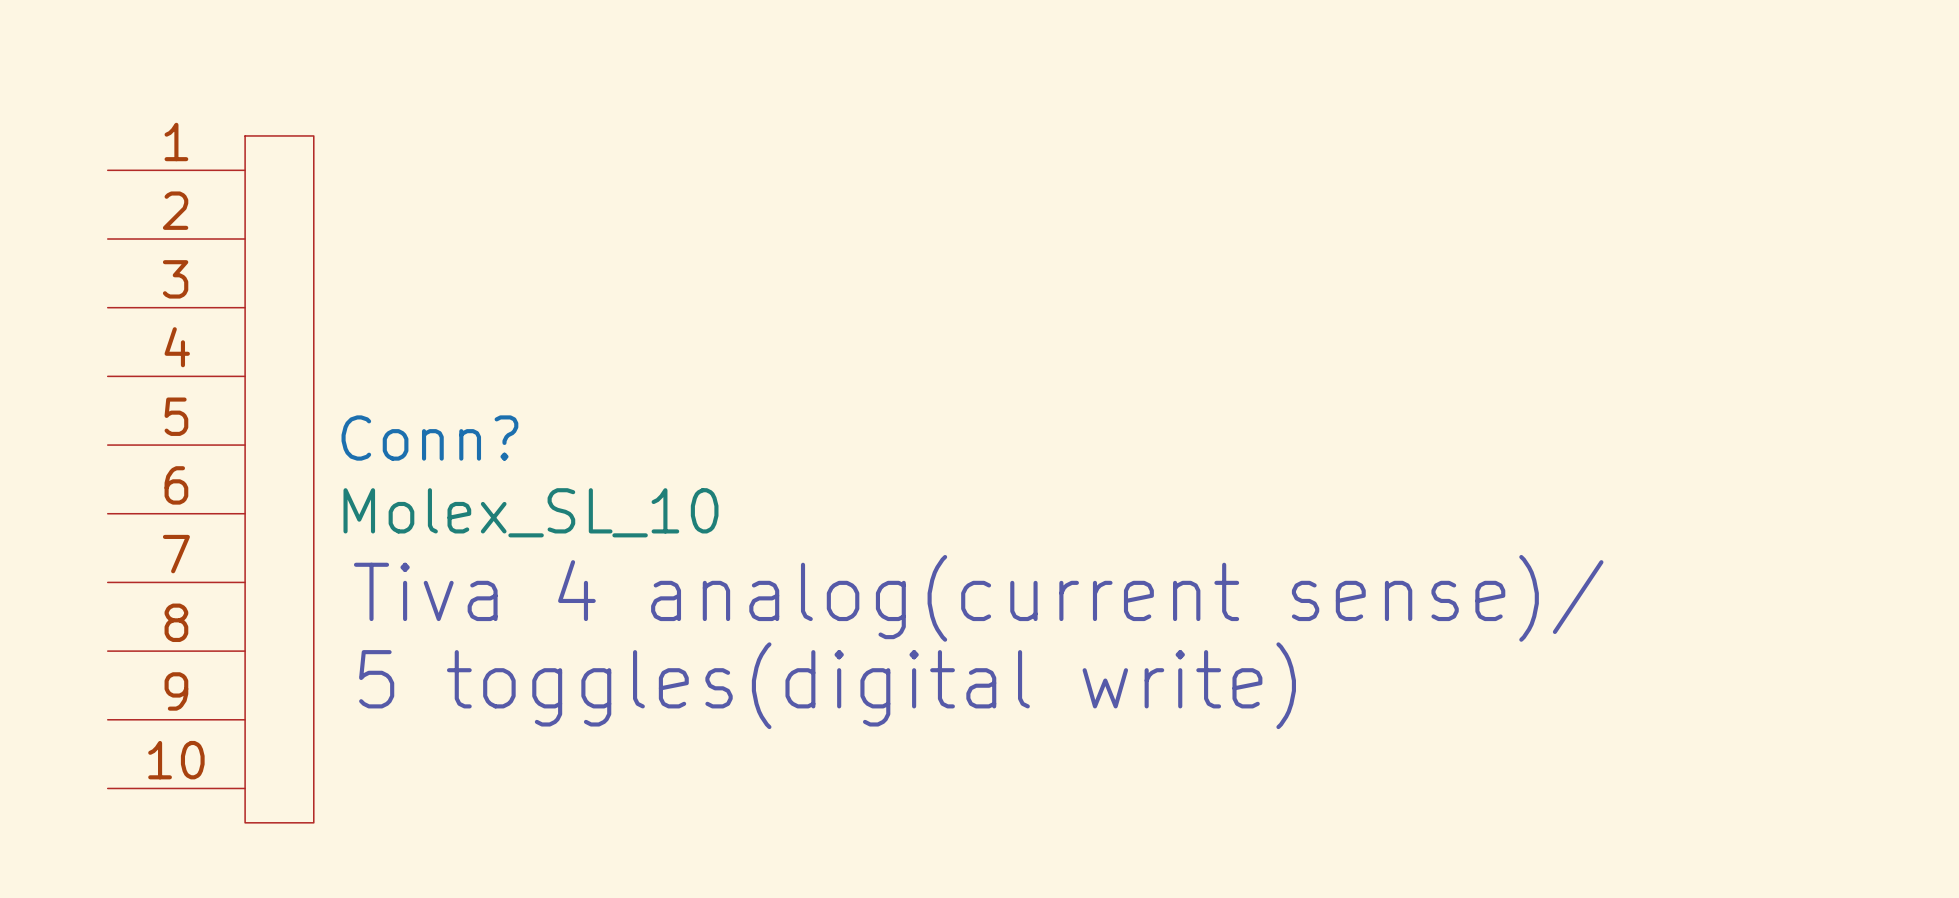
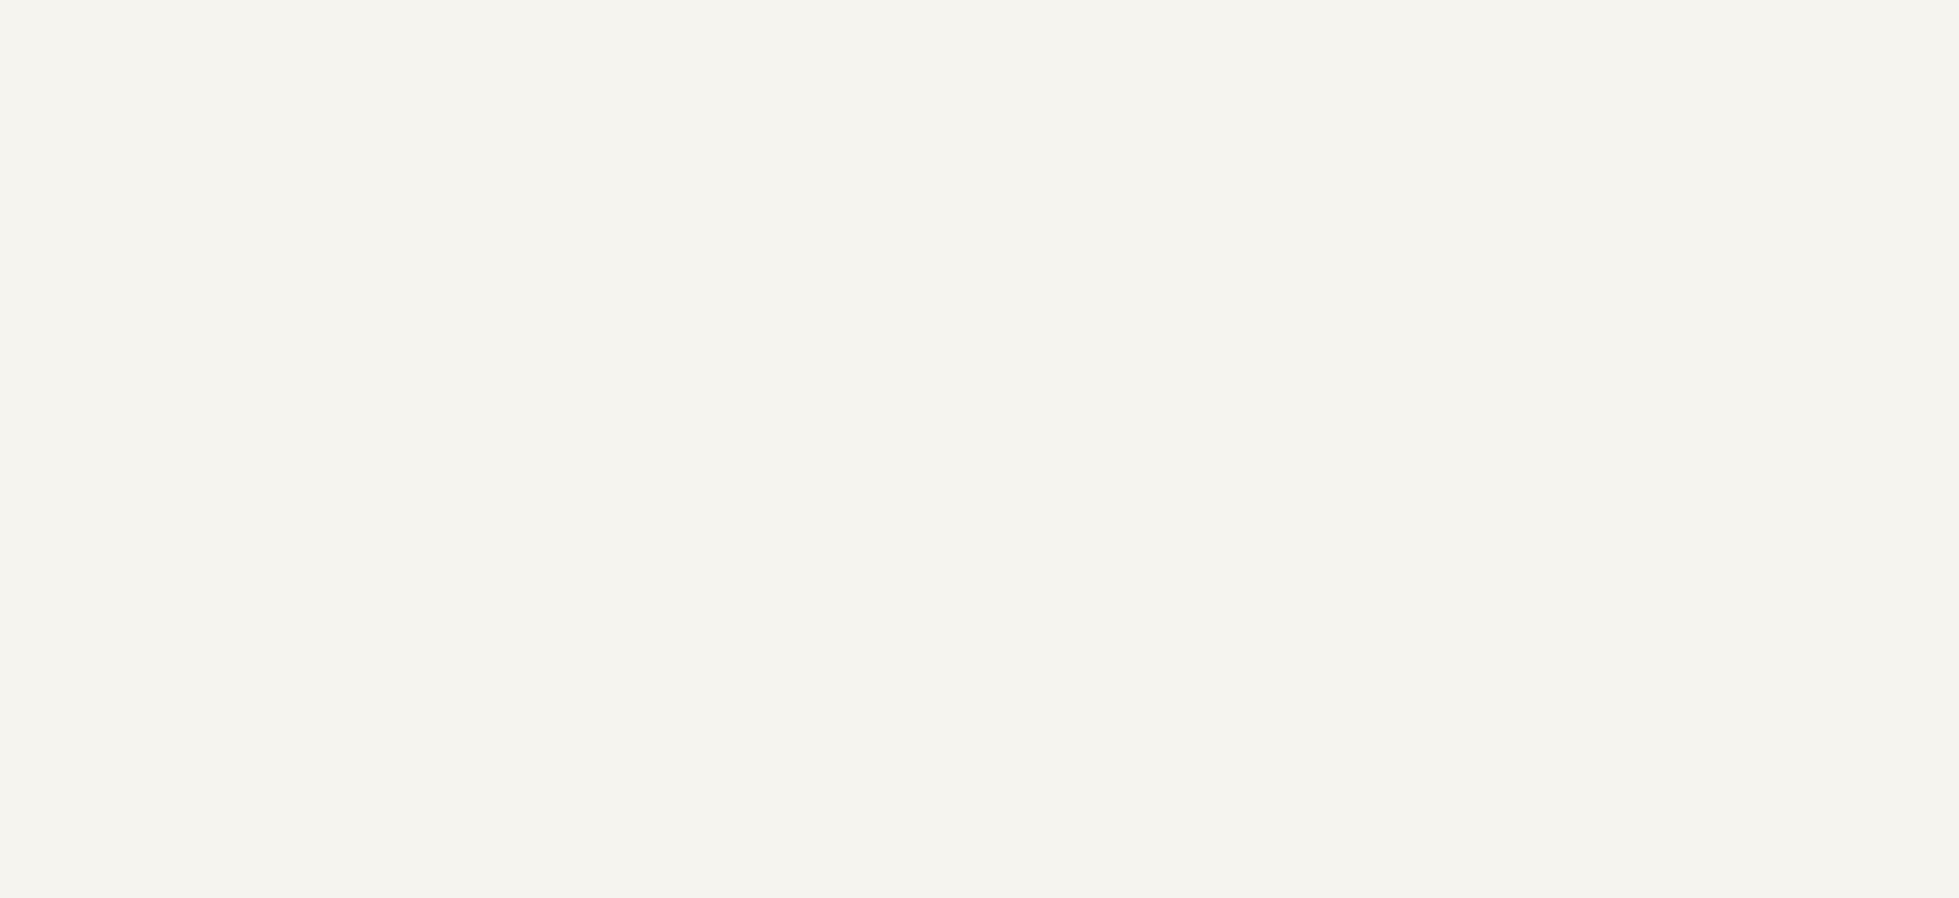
Conn?: Molex_SL_10 (210, 479) -> none
text: Tiva 4 analog(current sense)/ (978, 598) -> none
text: 5 toggles(digital write) (827, 685) -> none

